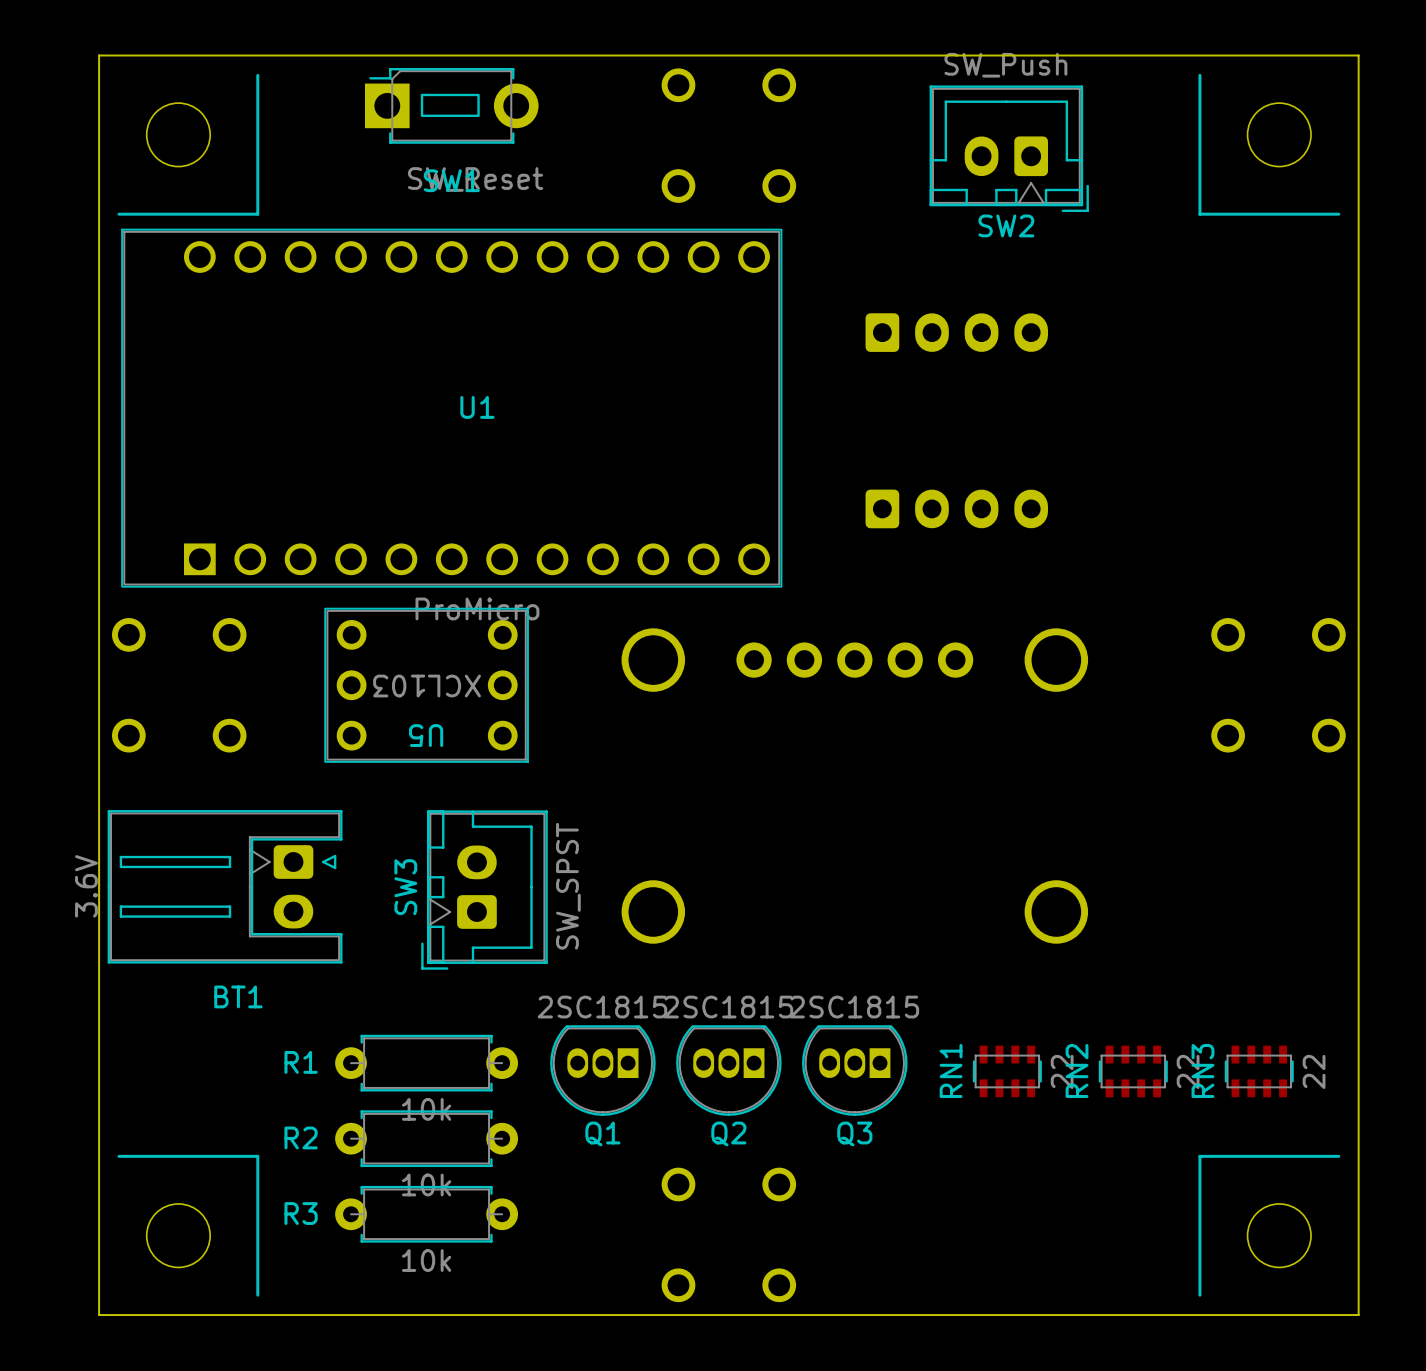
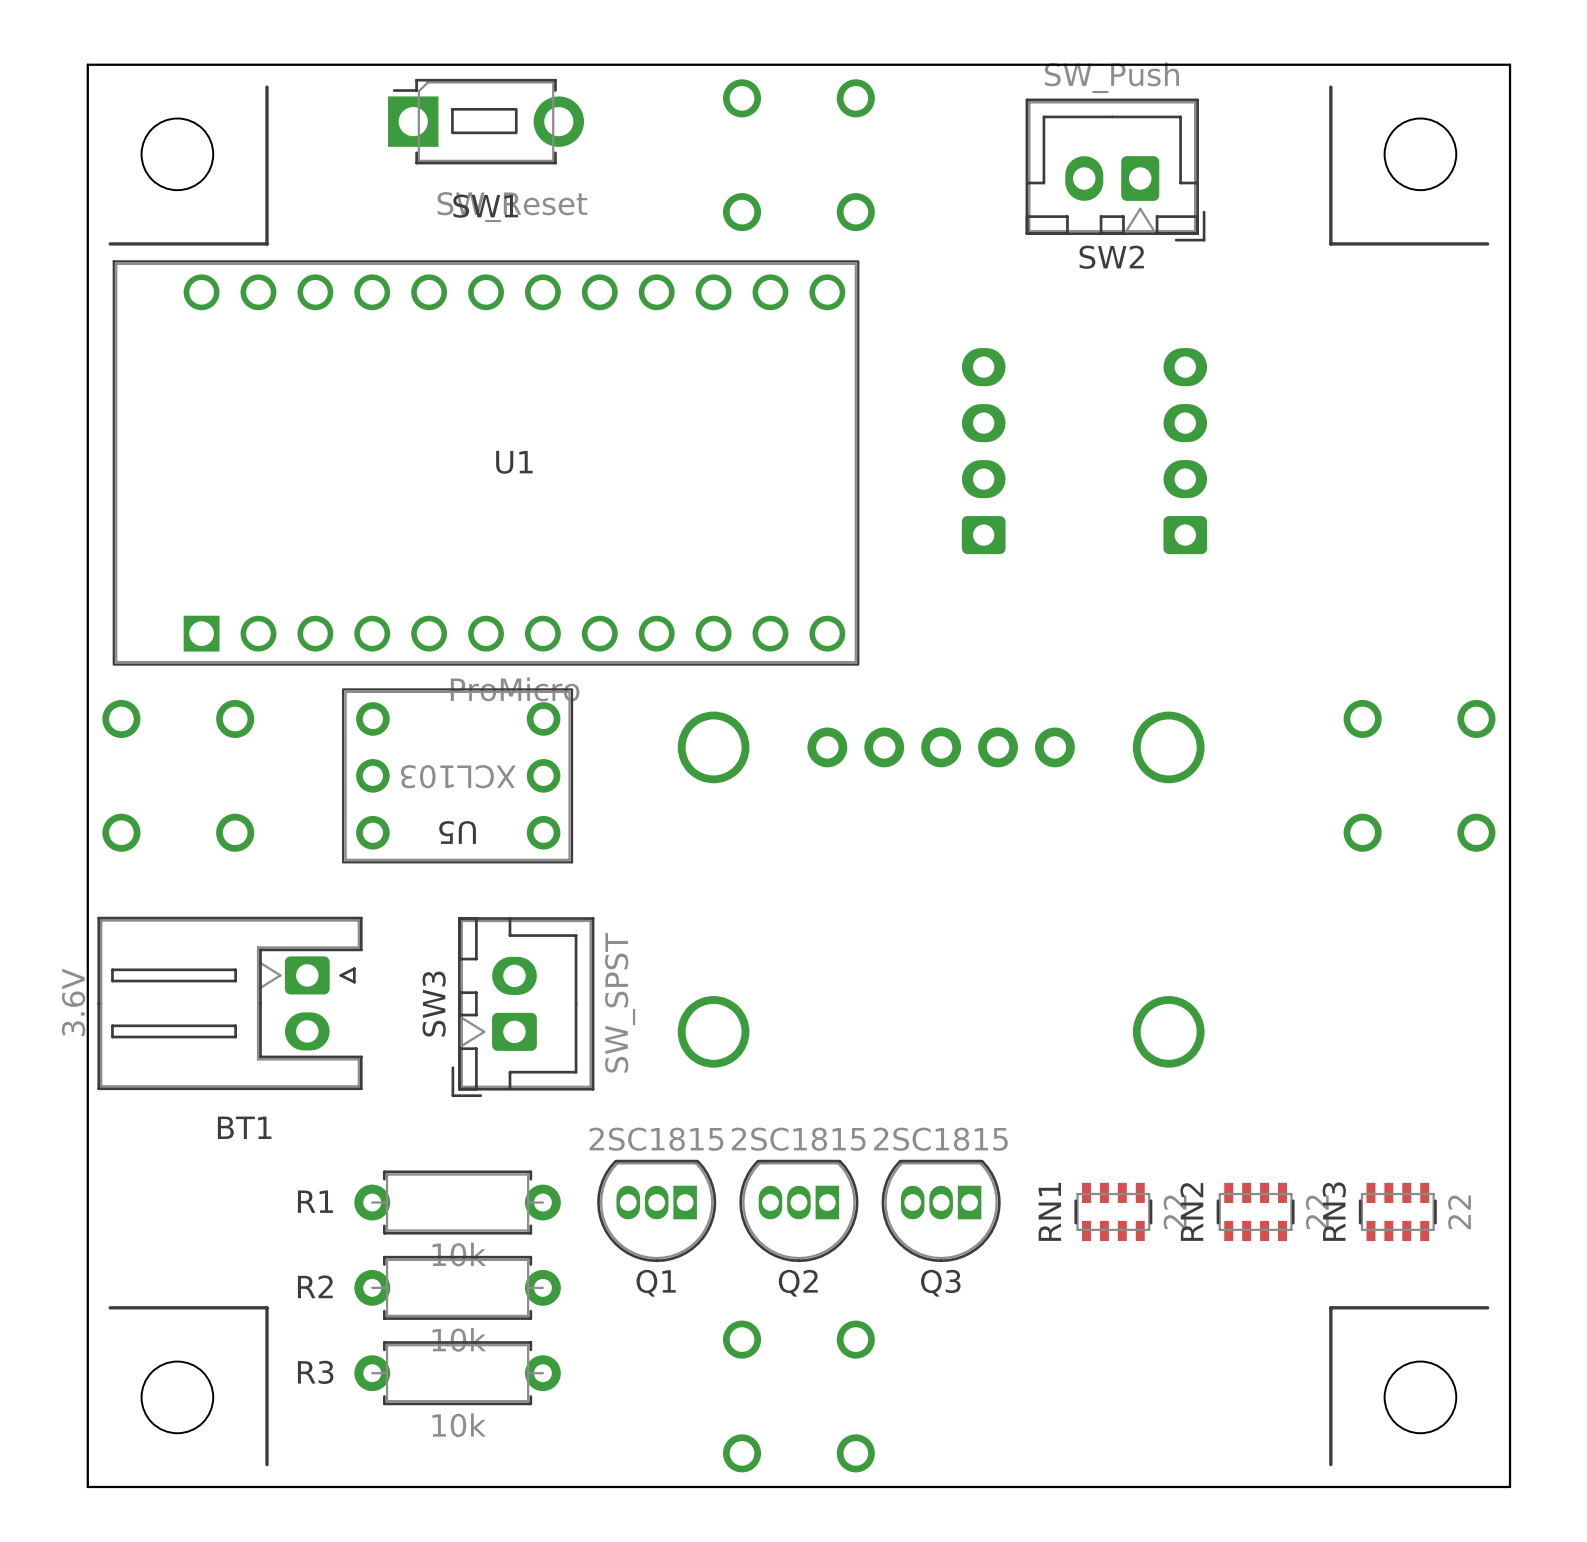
part: (956, 332) -> none
part: none -> (983, 451)
part: none -> (1185, 451)
part: (956, 508) -> none

